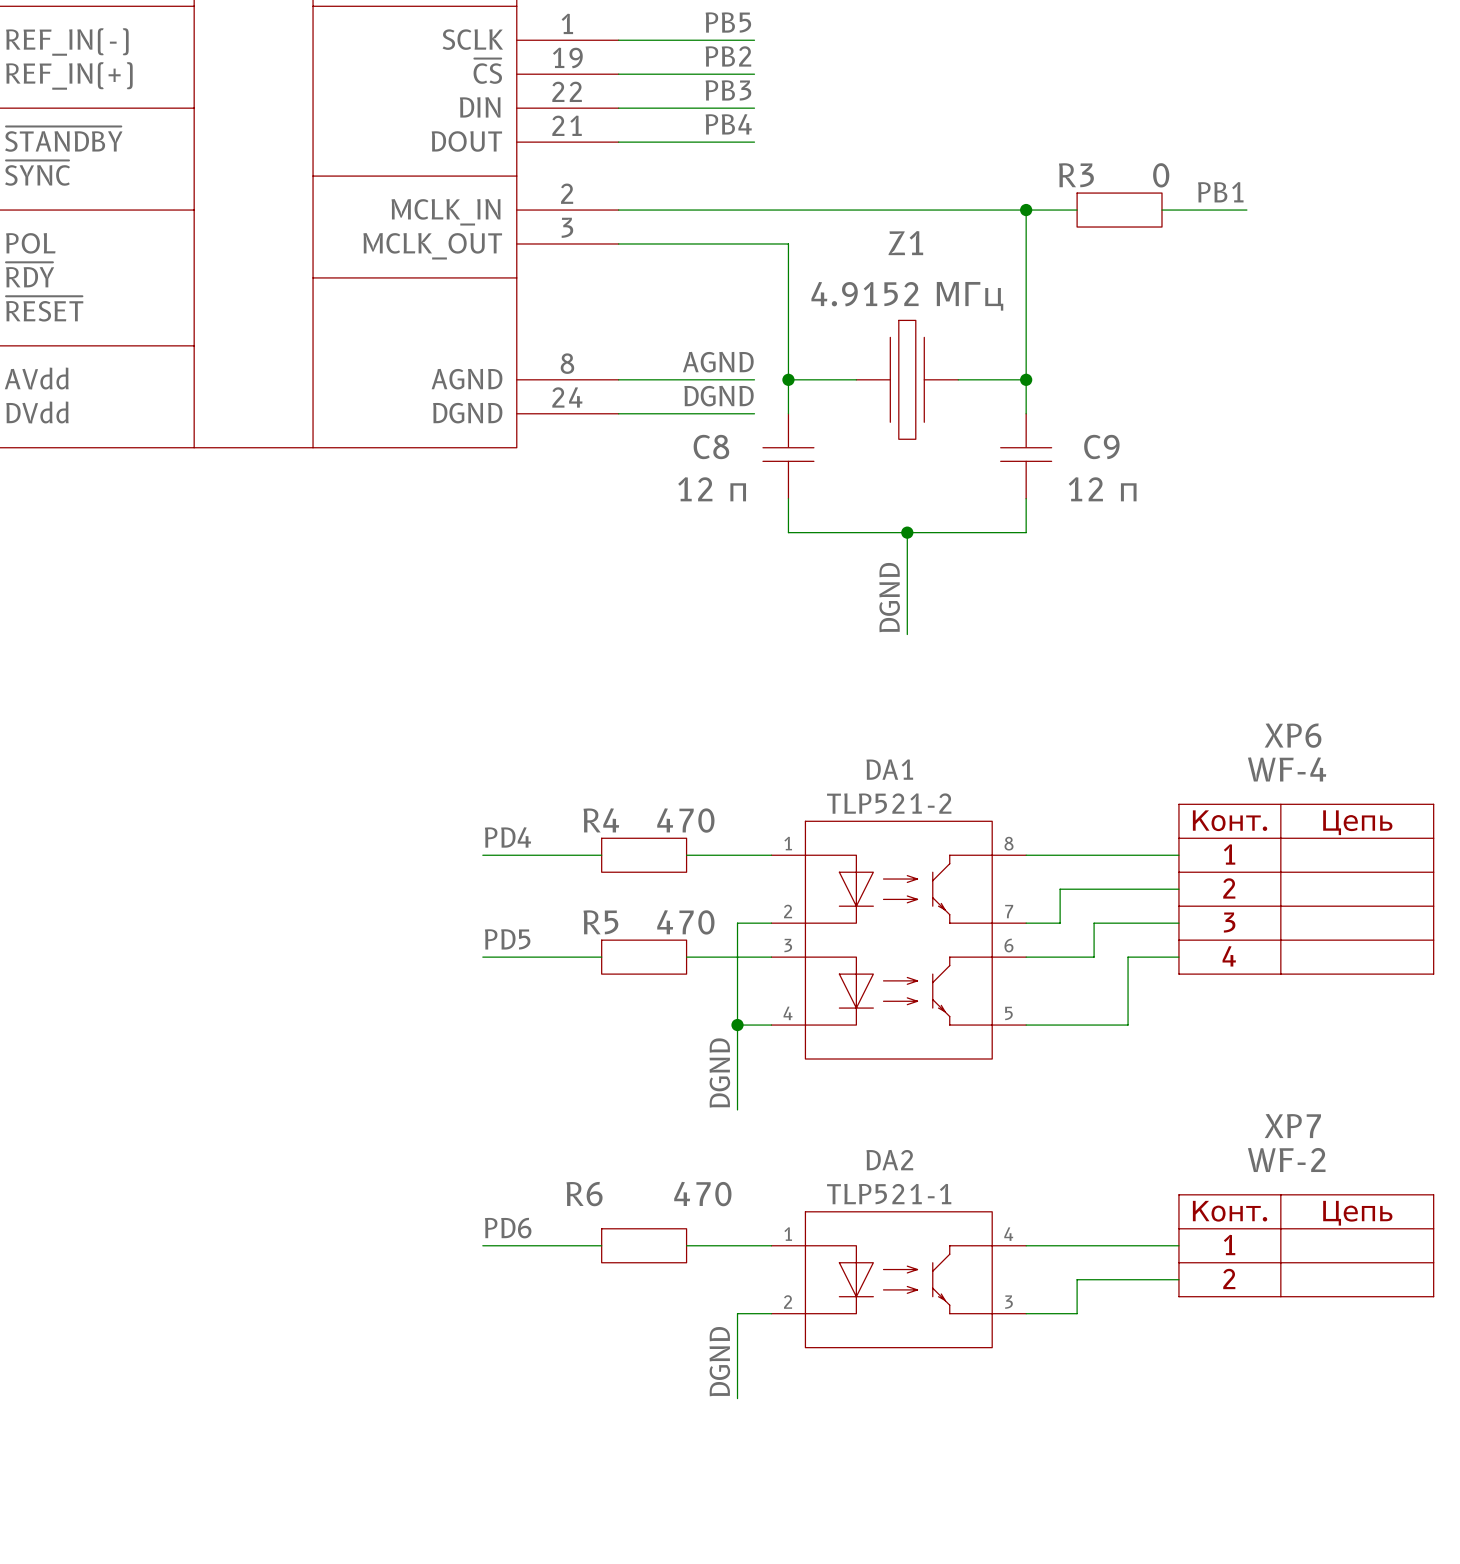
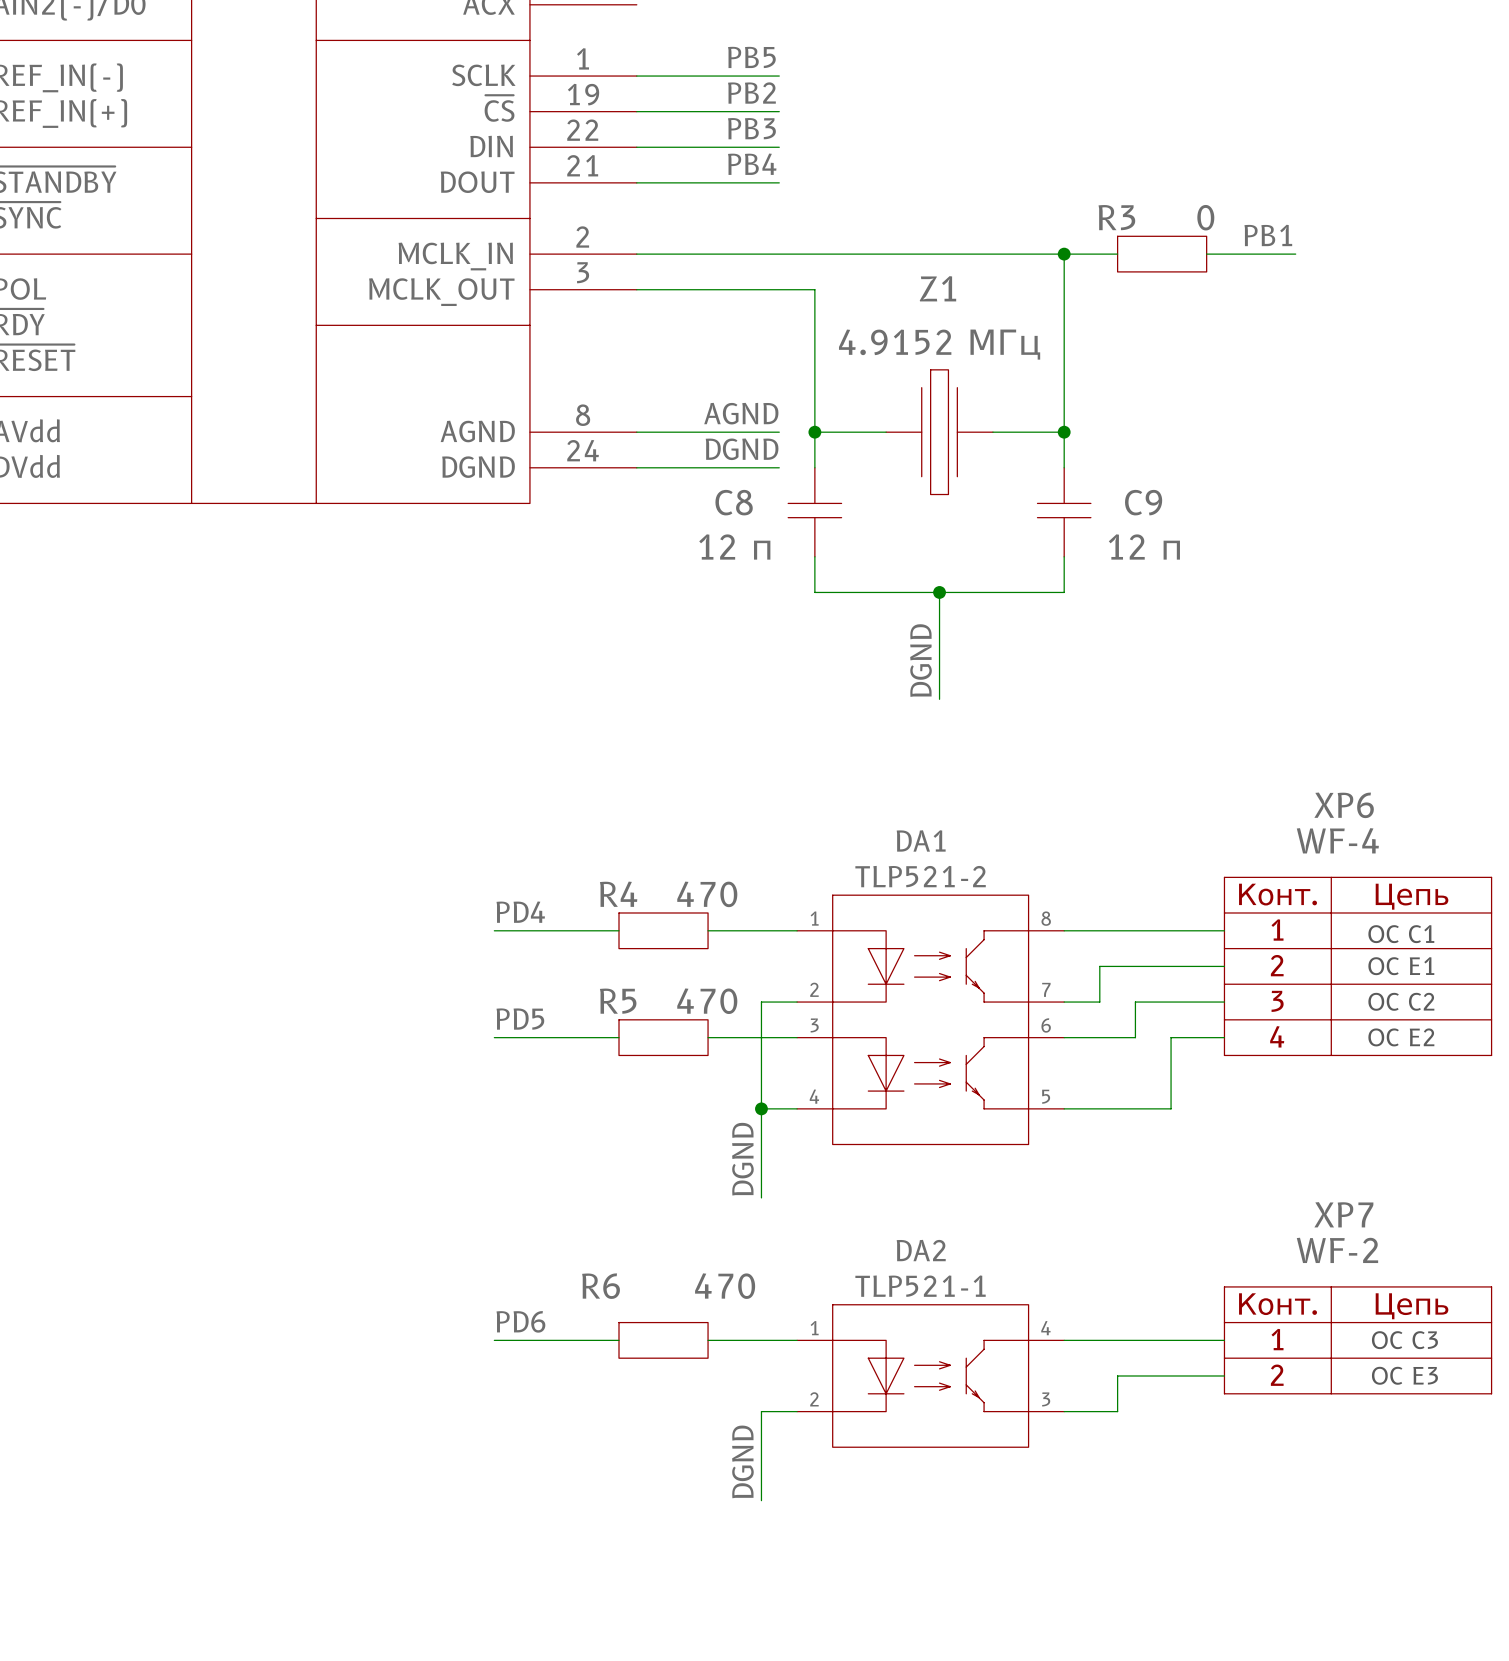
text: none -> OC C1 (1401, 934)
text: none -> OC E1 (1401, 966)
text: none -> OC C2 (1401, 1001)
text: none -> OC E2 (1401, 1037)
text: none -> OC C3 (1404, 1340)
text: none -> OC E3 (1404, 1375)

